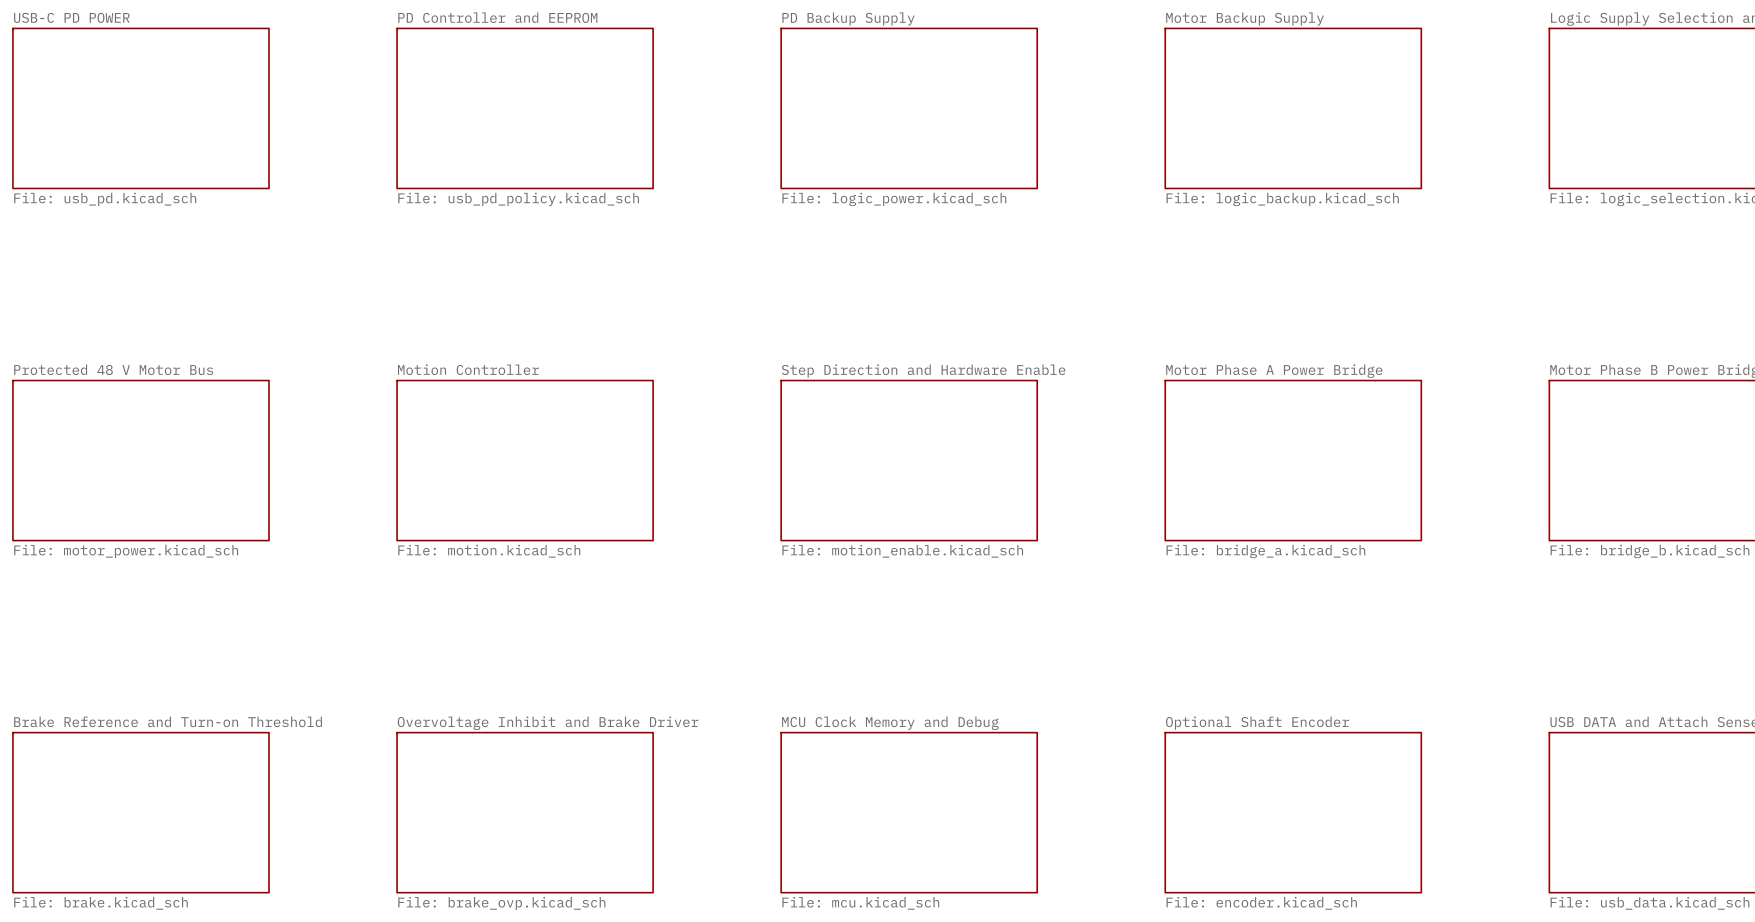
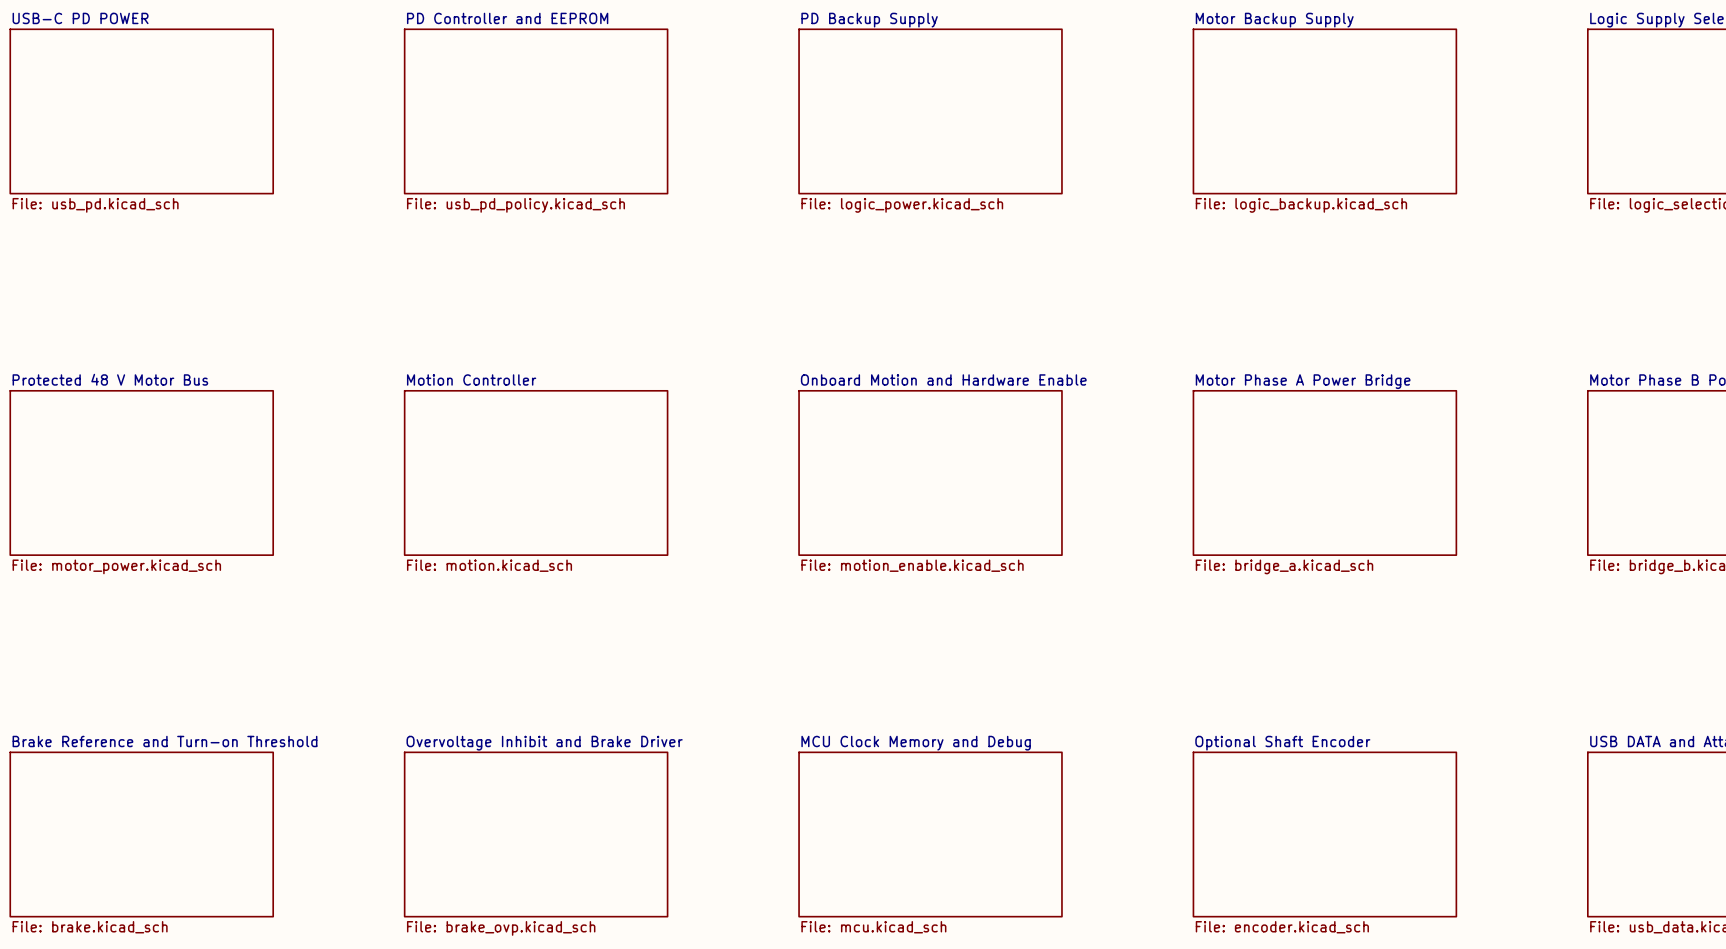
sheet Step Direction and Hardware Enable name: Step Direction and Hardware Enable (923, 371) -> Onboard Motion and Hardware Enable (943, 379)

